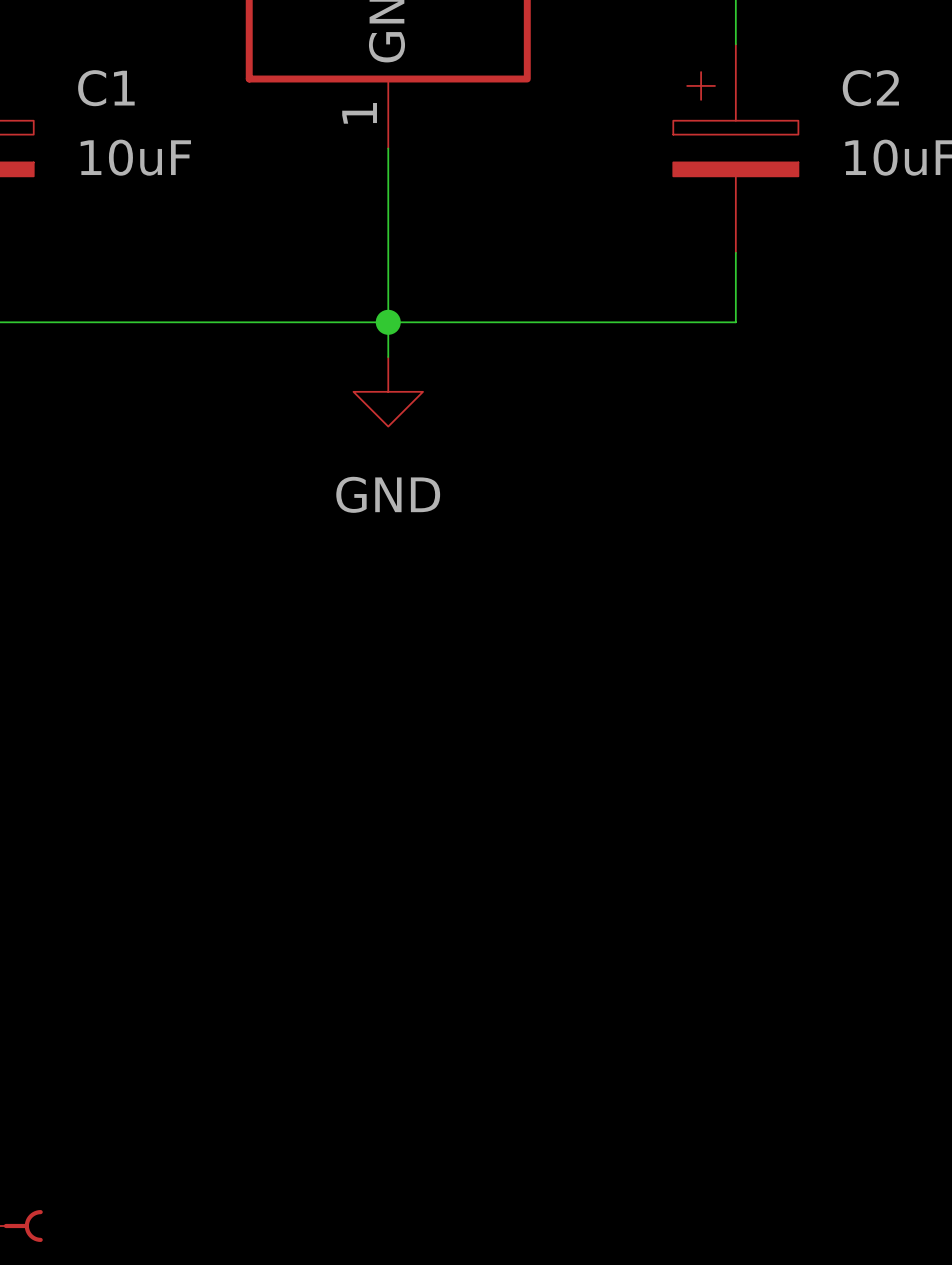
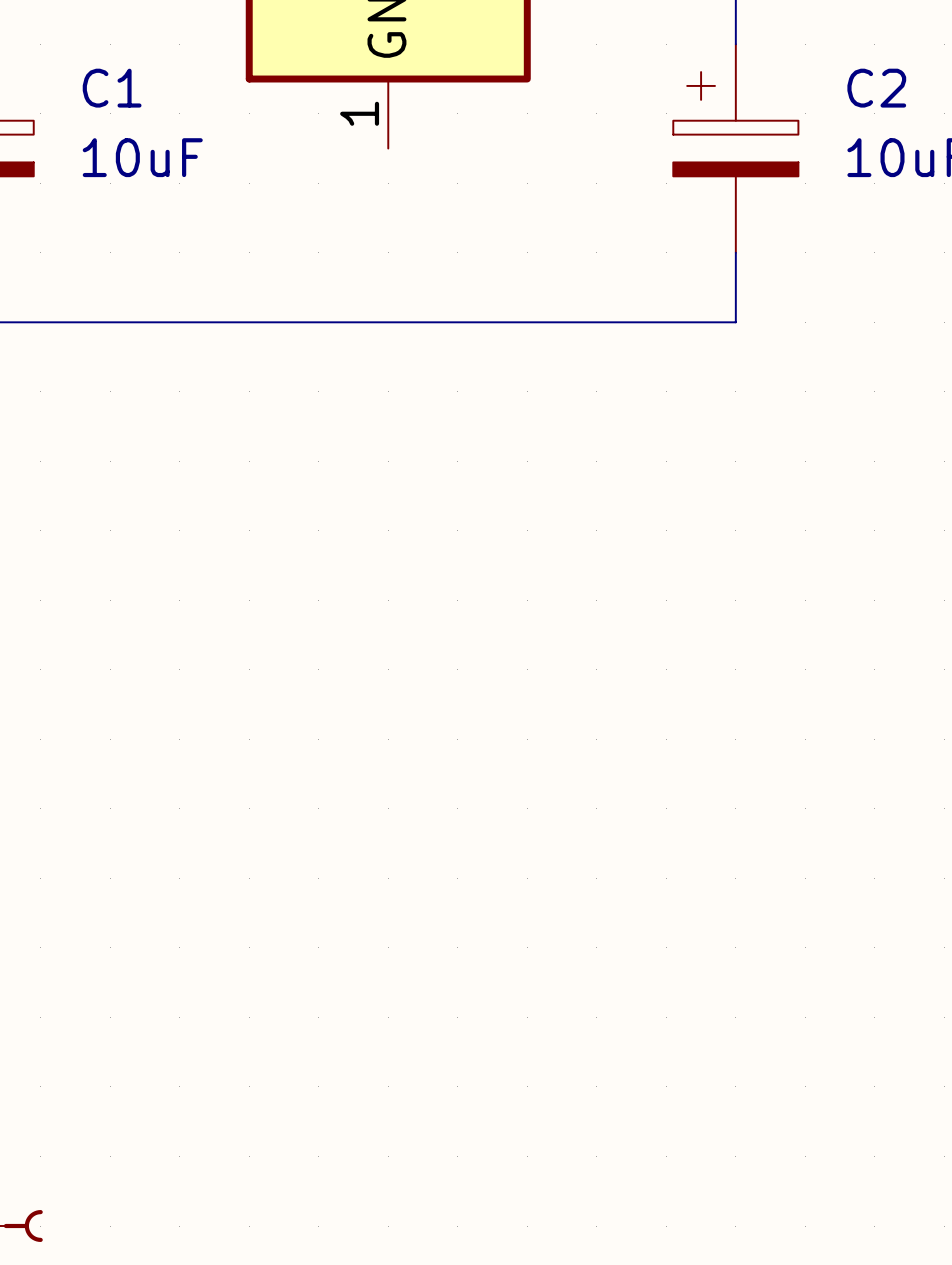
wire: (388, 148) (388, 357) -> none
junction: (388, 322) -> none
power symbol: GND (388, 391) -> none

